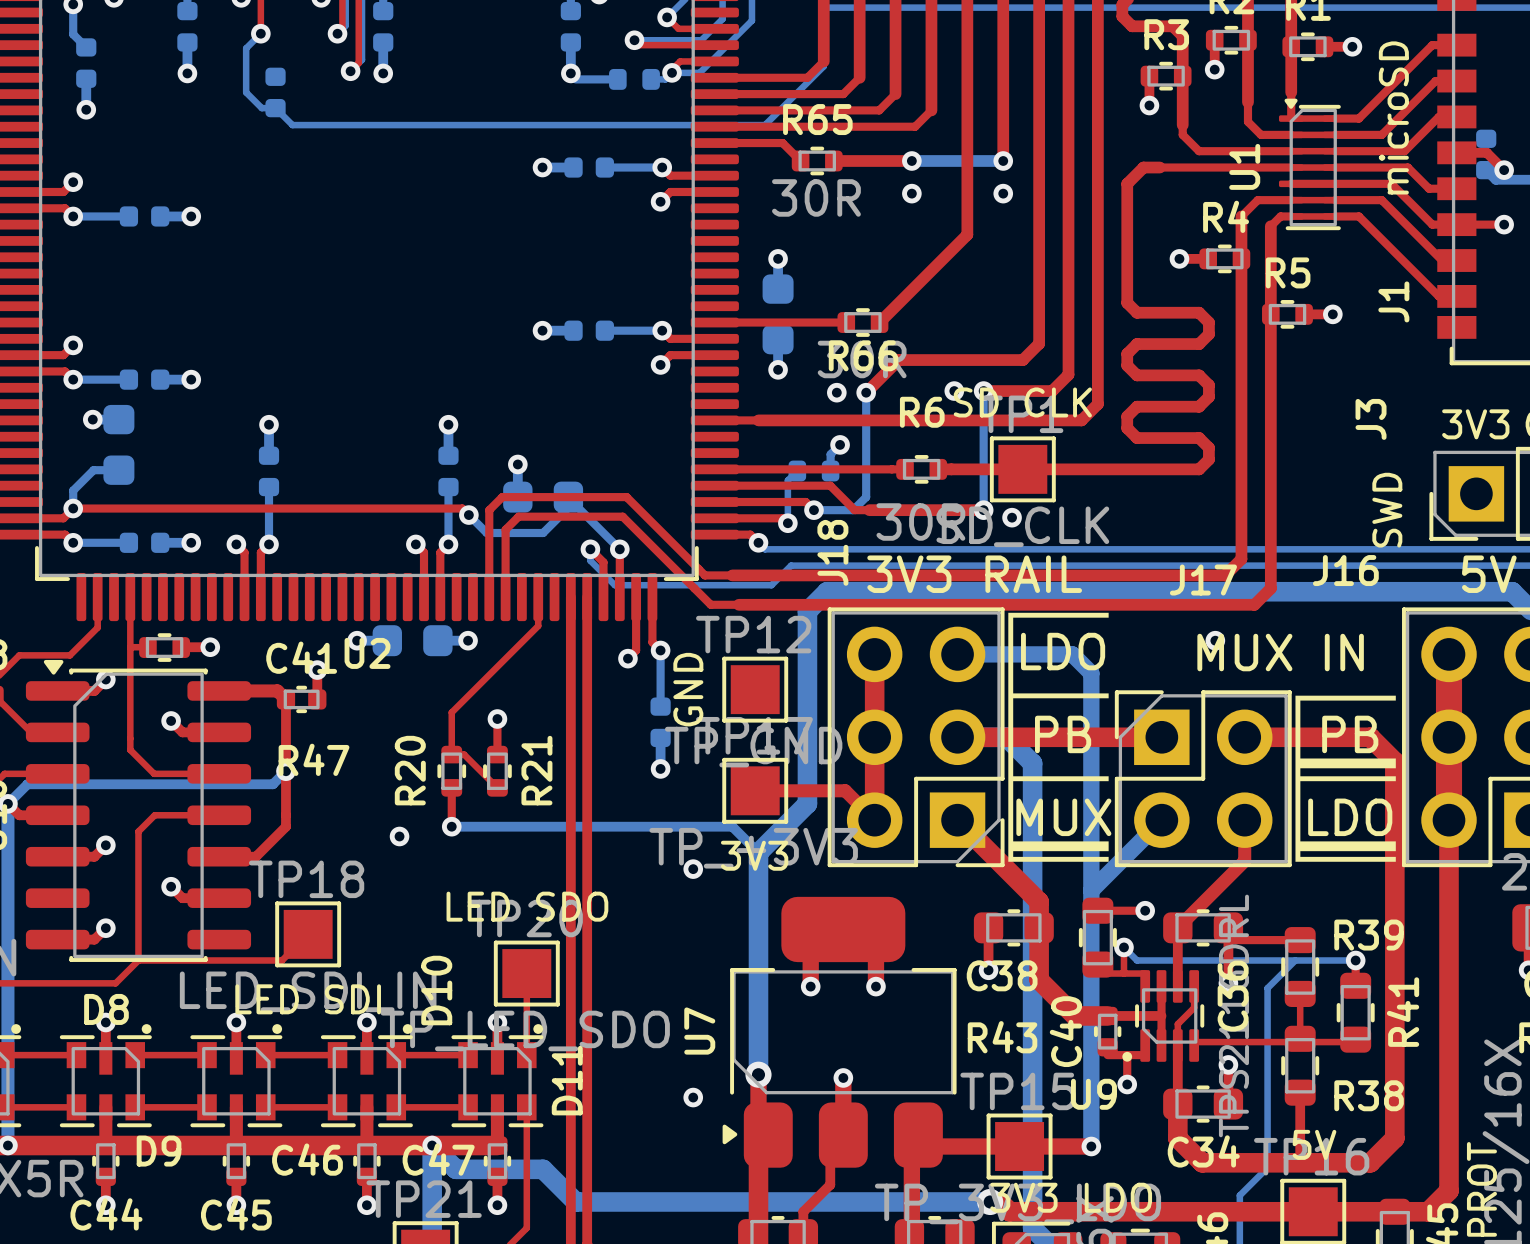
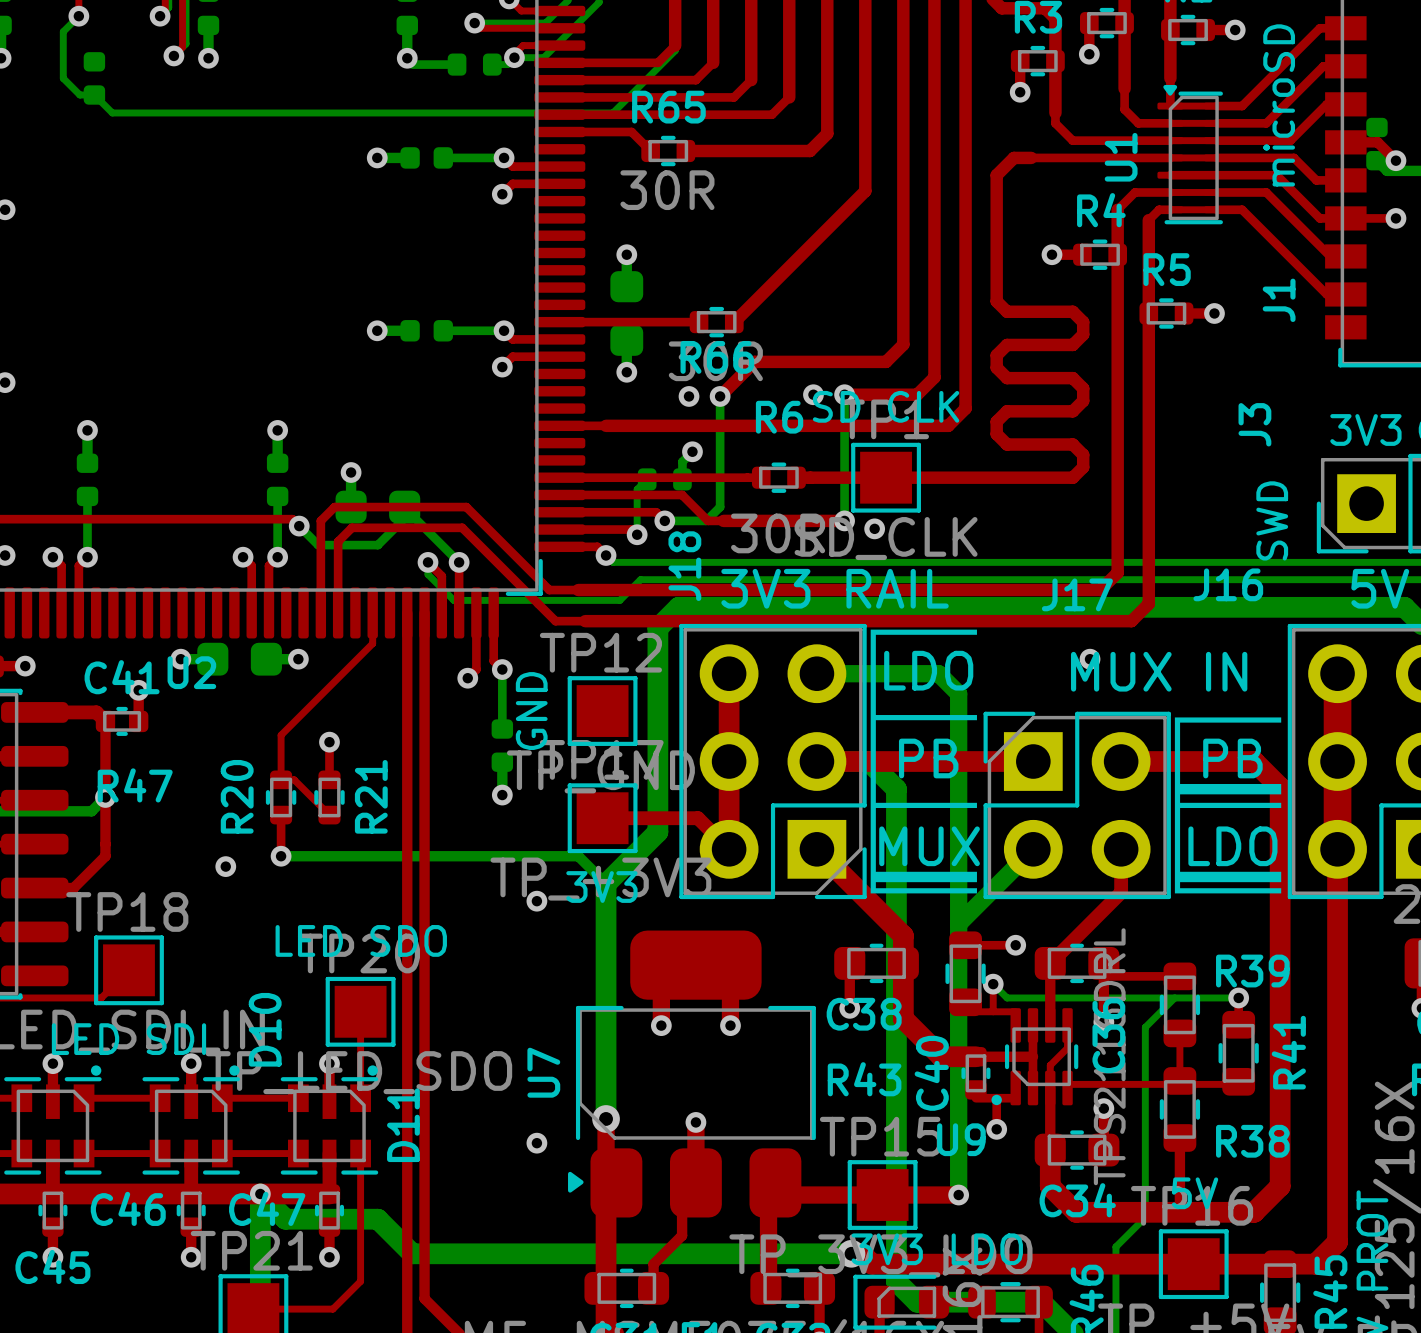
top track: (967, 144) (967, 234) -> (865, 151) (865, 191) (827, 229)
top track: none -> (827, 133) (810, 151) (768, 151)
bottom track: (911, 160) (1003, 160) -> none
via: (911, 160) -> none
via: (1003, 160) -> none
via: (911, 193) -> none
via: (1003, 193) -> none

